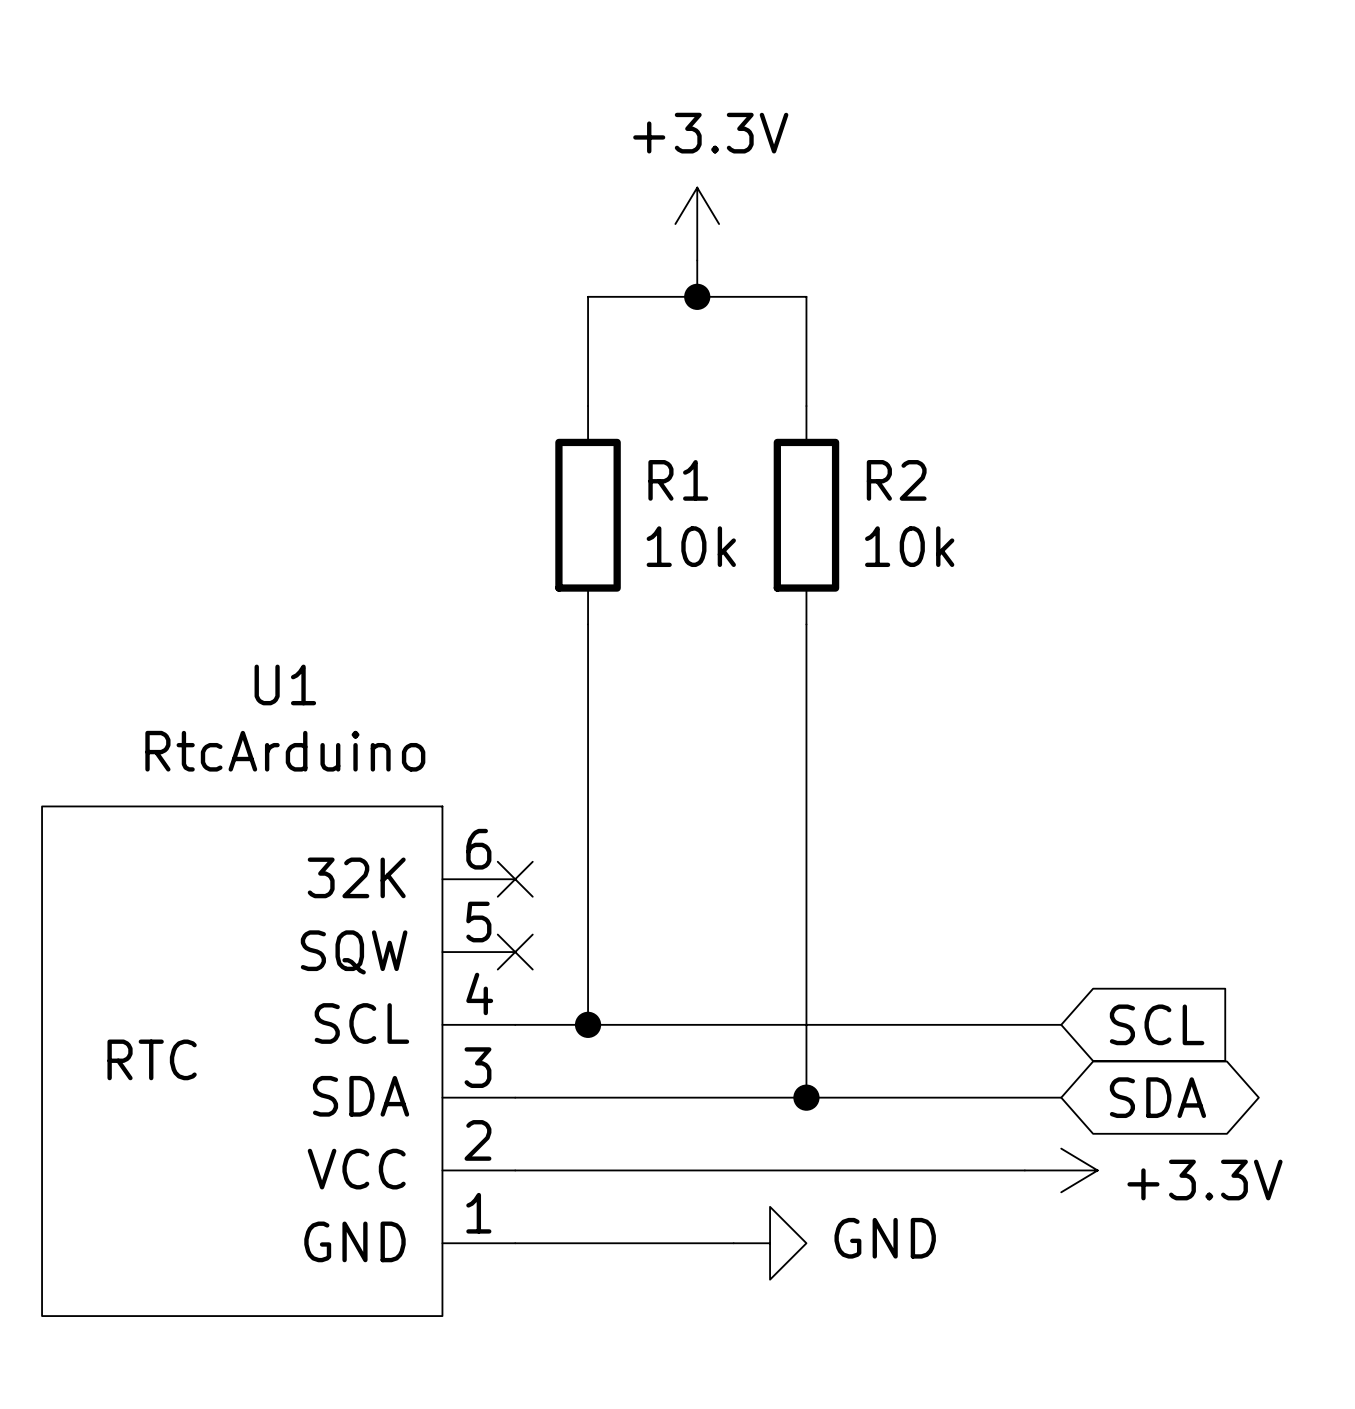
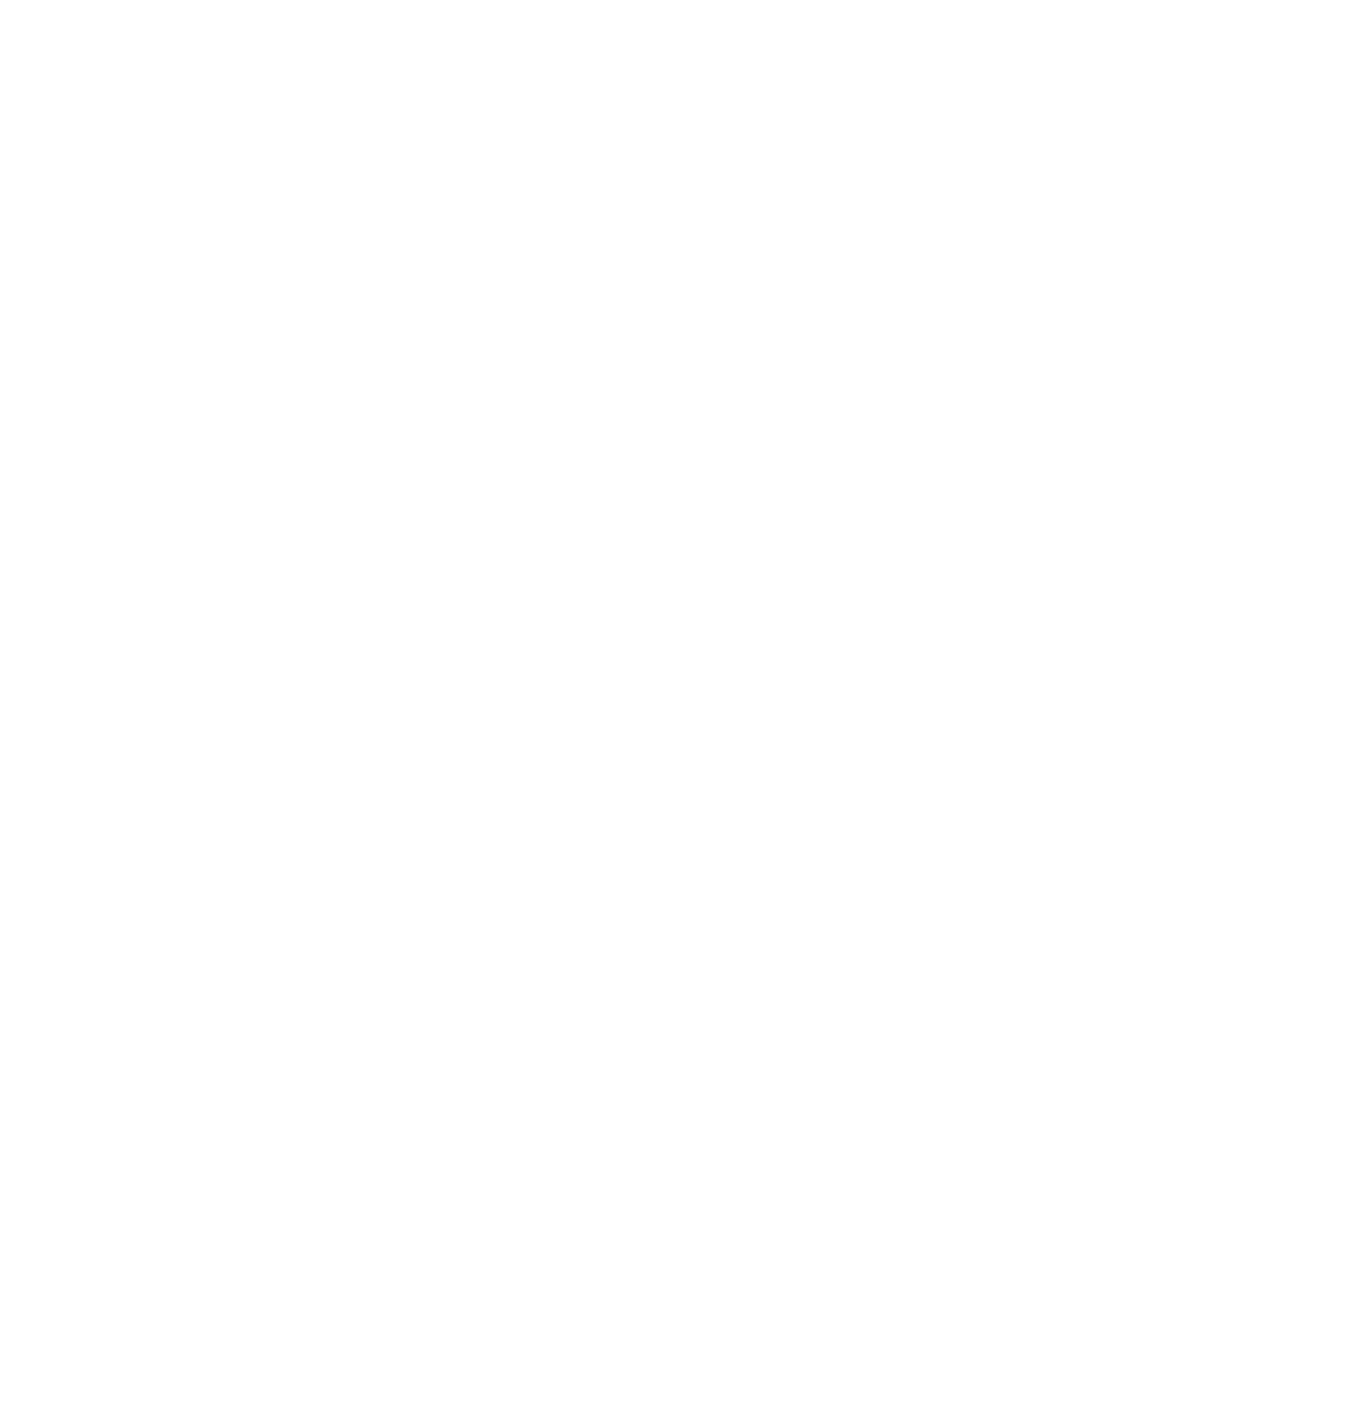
power symbol: +3.3V (697, 224) -> none
wire: (697, 260) (697, 296) -> none
junction: (697, 296) -> none
wire: (588, 406) (588, 296) (806, 296) (806, 406) -> none
R1: 10k (588, 515) -> none
R2: 10k (806, 515) -> none
wire: (588, 624) (588, 1024) -> none
wire: (806, 624) (806, 1097) -> none
no-connect mark: (515, 879) -> none
no-connect mark: (515, 952) -> none
wire: (515, 1024) (1061, 1024) -> none
junction: (588, 1024) -> none
global label: SCL (1157, 1024) -> none
U1: RtcArduino (278, 1061) -> none
wire: (515, 1097) (1061, 1097) -> none
junction: (806, 1097) -> none
global label: SDA (1157, 1097) -> none
wire: (515, 1170) (1024, 1170) -> none
power symbol: +3.3V (1061, 1170) -> none
wire: (515, 1243) (733, 1243) -> none
power symbol: GND (770, 1243) -> none

